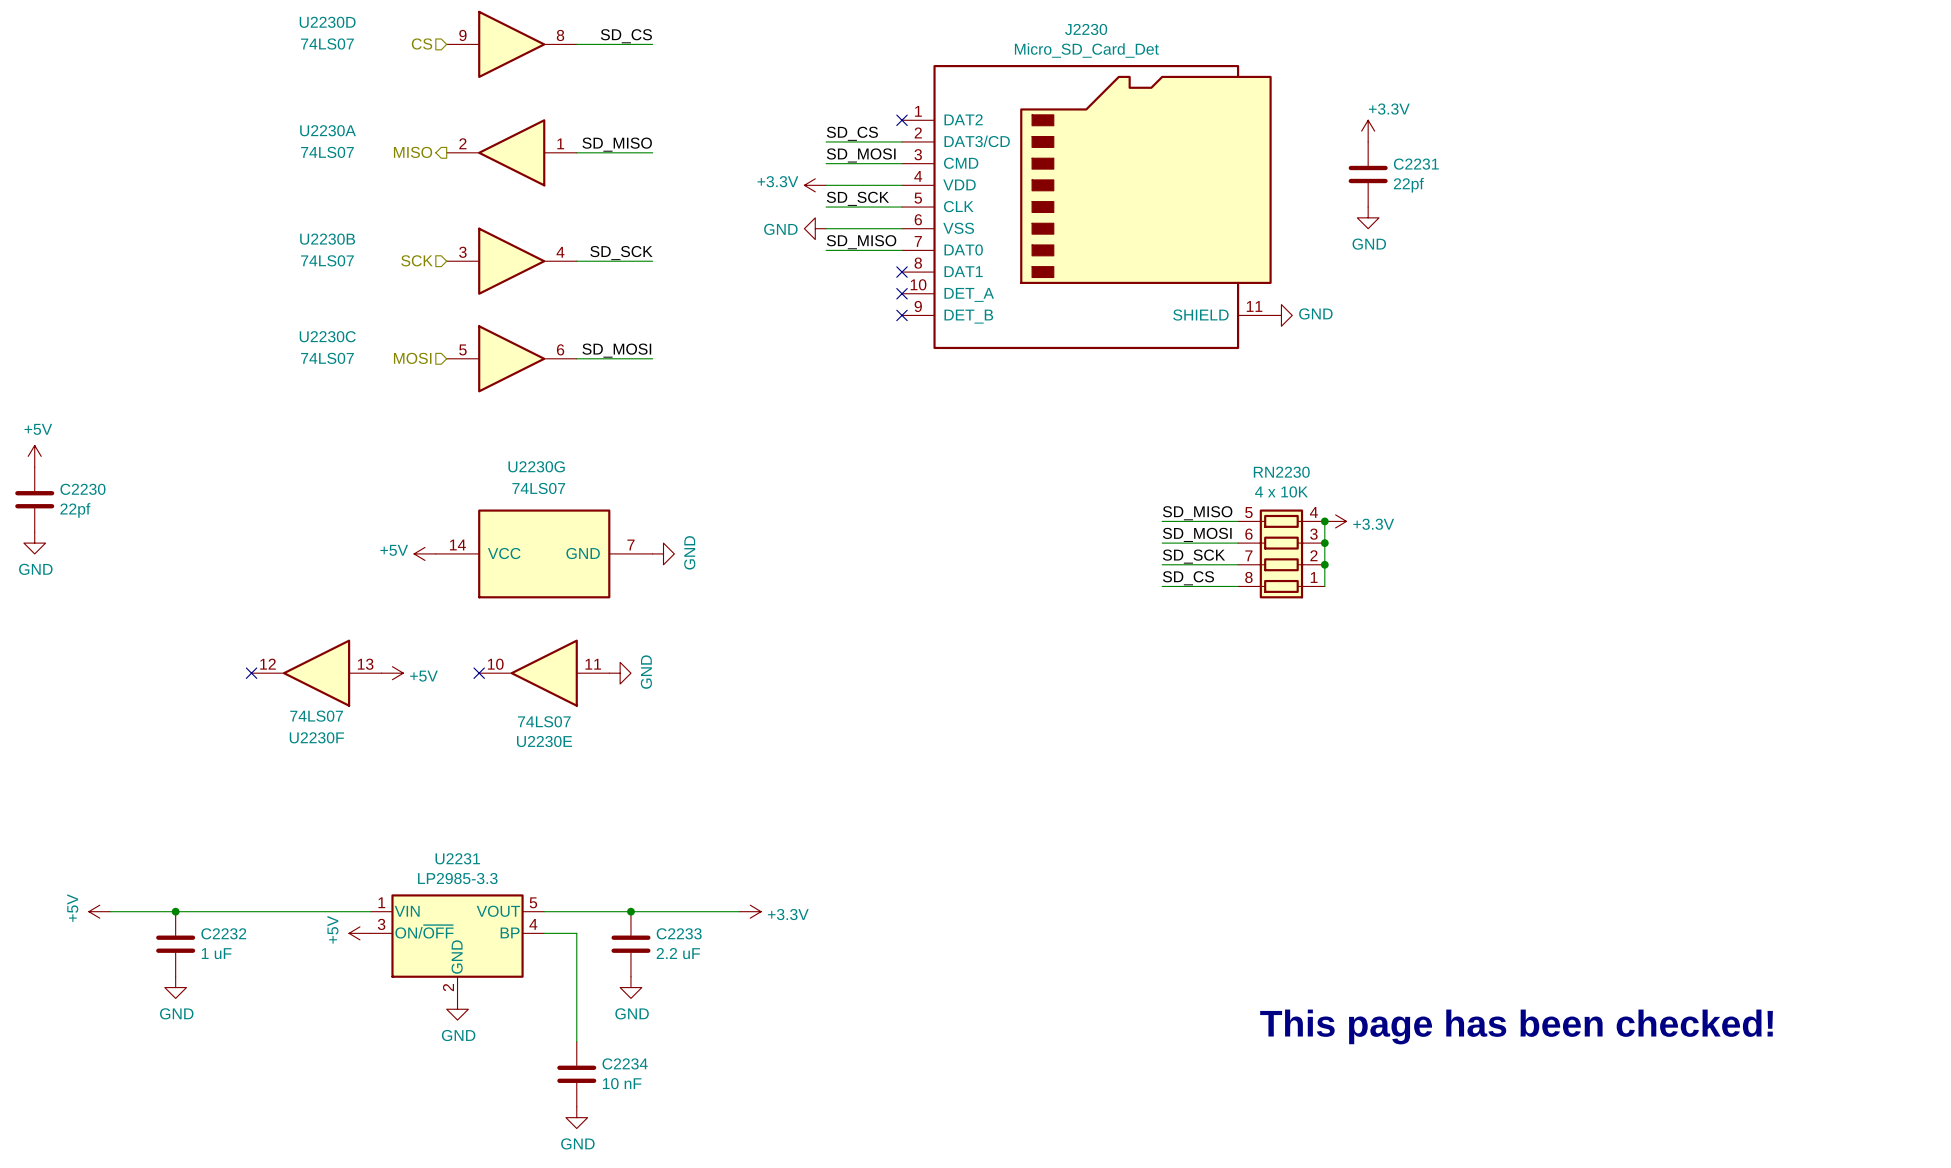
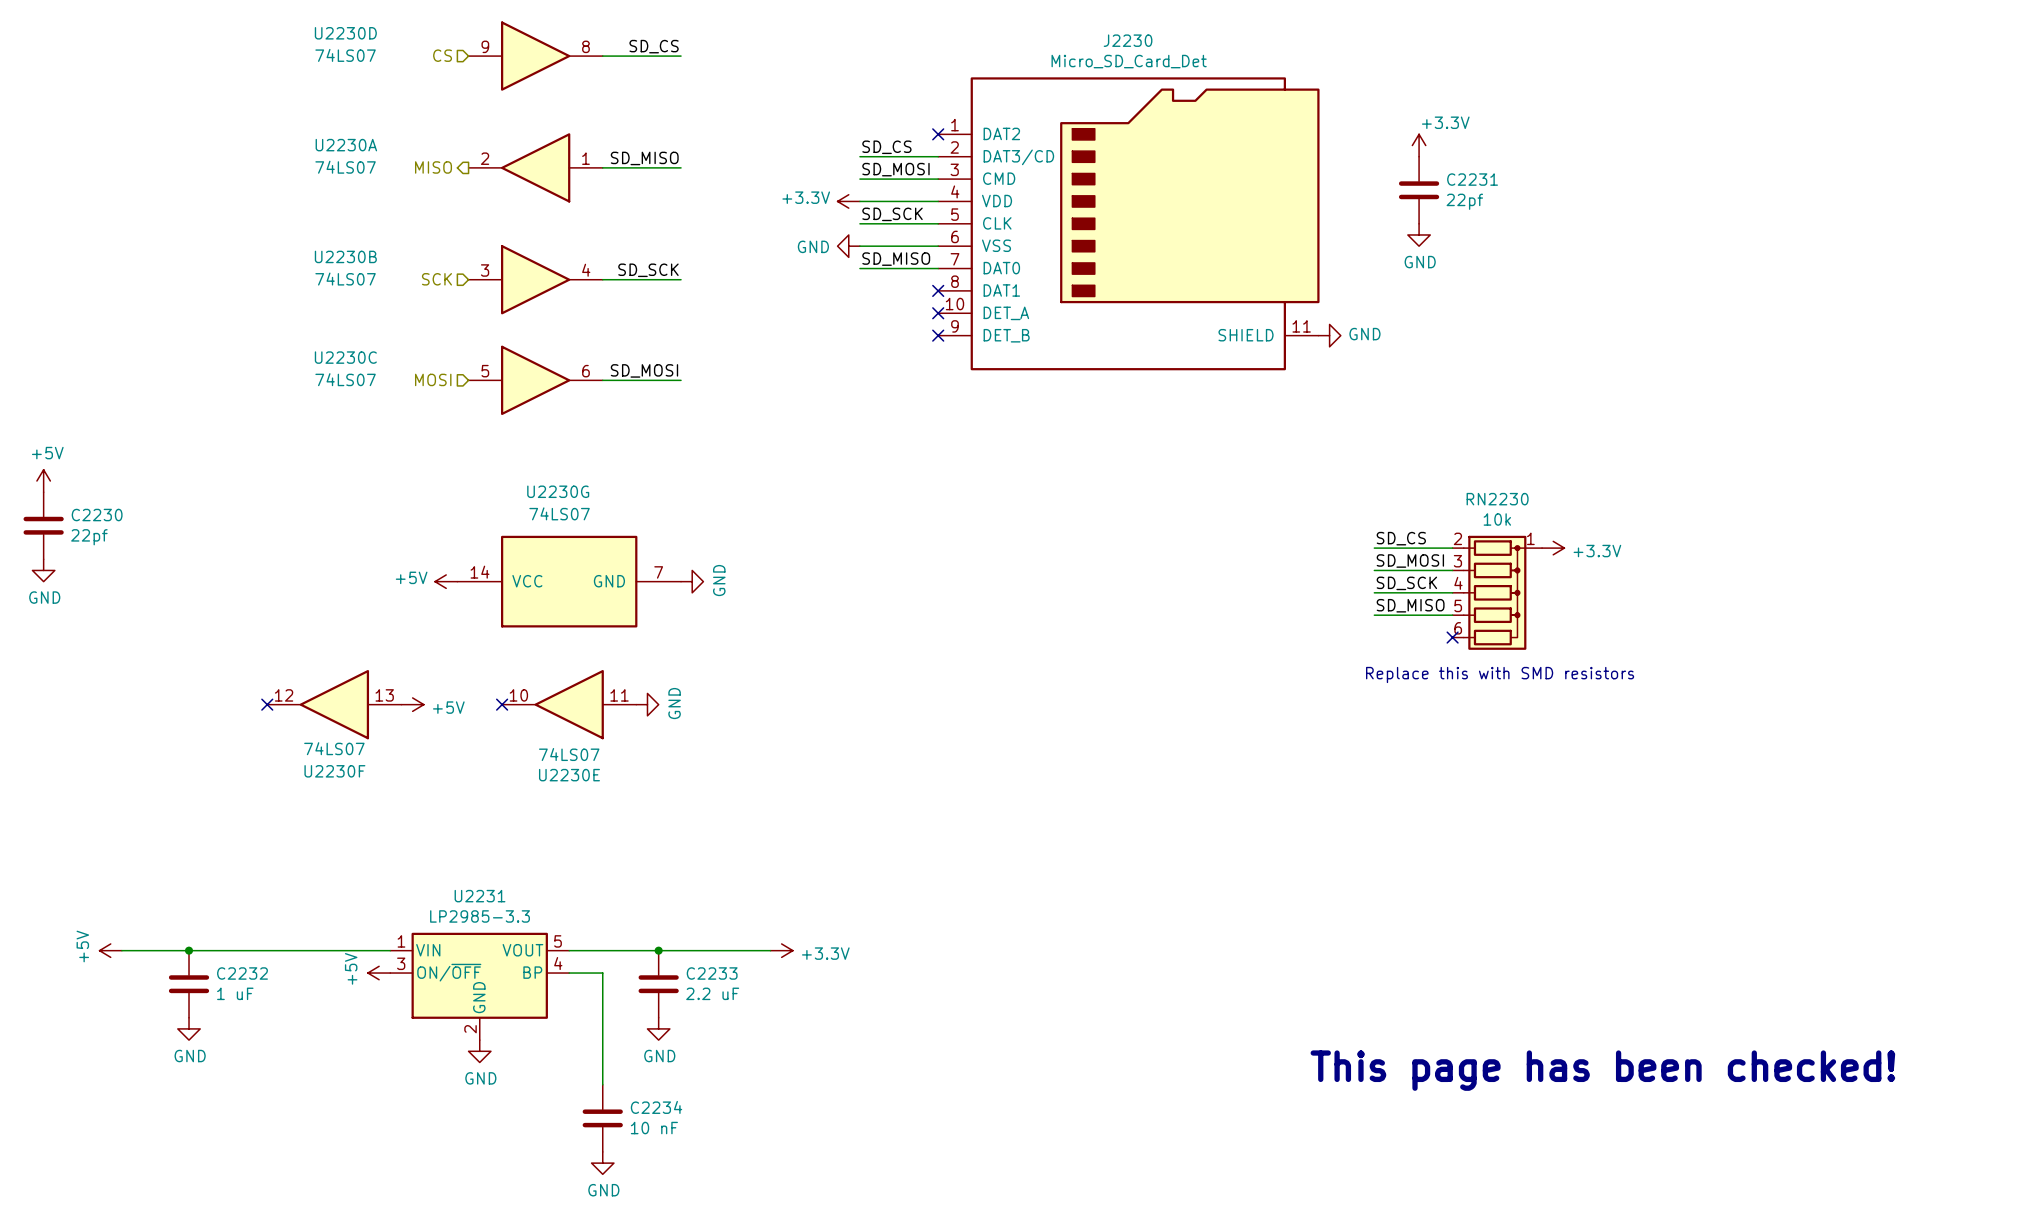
RN2230 value: 4 x 10K (1281, 491) -> 10k (1497, 519)
RN2230 symbol: [1238, 509, 1325, 599] -> [1452, 535, 1543, 650]
label position: SD_MISO (1197, 513) -> SD_MISO (1410, 605)
wire: (1162, 521) (1238, 521) -> none
wire: (1324, 521) (1324, 586) -> (1374, 548) (1452, 548)
junction: (1324, 521) -> none
power symbol position: +3.3V (1335, 521) -> +3.3V (1553, 548)
label position: SD_MOSI (1197, 534) -> SD_MOSI (1410, 561)
wire: (1162, 543) (1238, 543) -> (1374, 570) (1452, 570)
junction: (1324, 543) -> none
label position: SD_SCK (1193, 556) -> SD_SCK (1406, 583)
wire: (1162, 564) (1238, 564) -> (1374, 592) (1452, 592)
junction: (1324, 564) -> none
label position: SD_CS (1188, 578) -> SD_CS (1401, 538)
wire: (1162, 586) (1238, 586) -> (1374, 615) (1452, 615)
no-connect mark: none -> (1452, 637)
text: none -> Replace this with SMD resistors (1500, 674)

